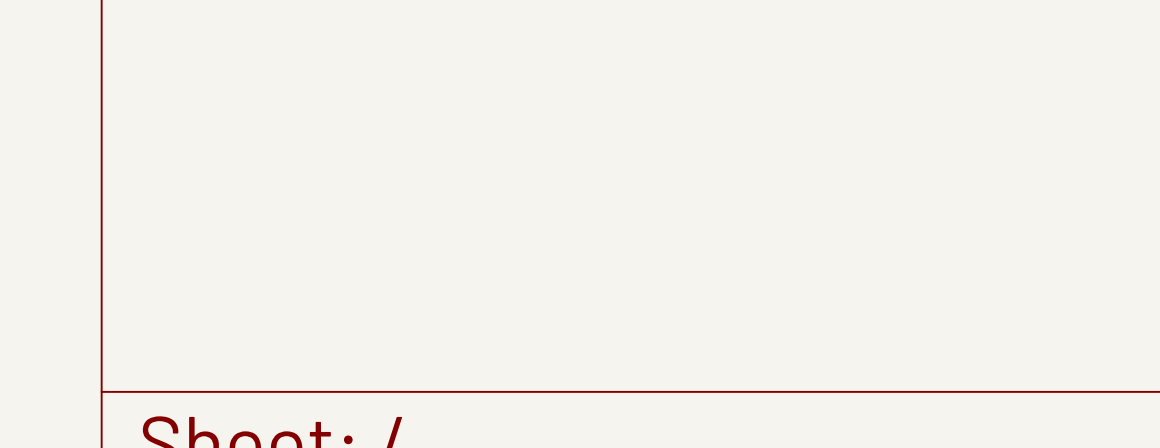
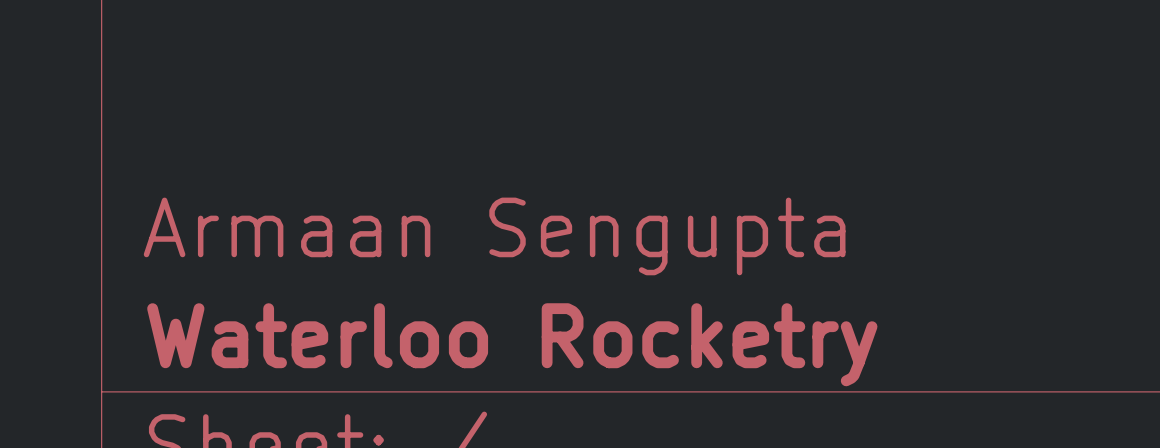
title block: none -> Armaan Sengupta (494, 236)
title block: none -> Waterloo Rocketry (512, 344)

